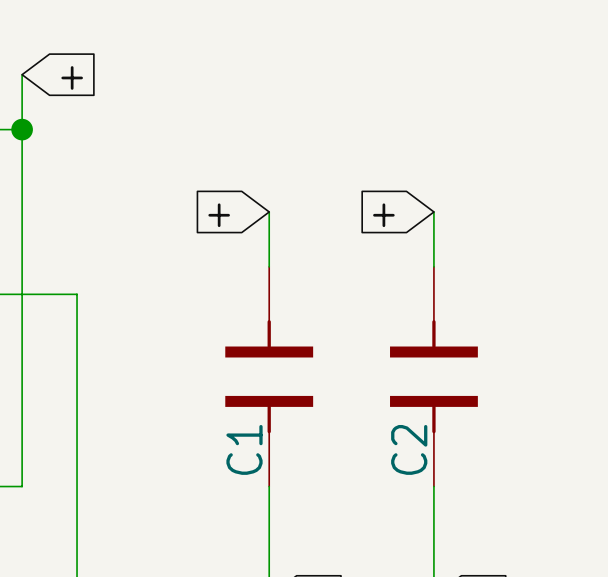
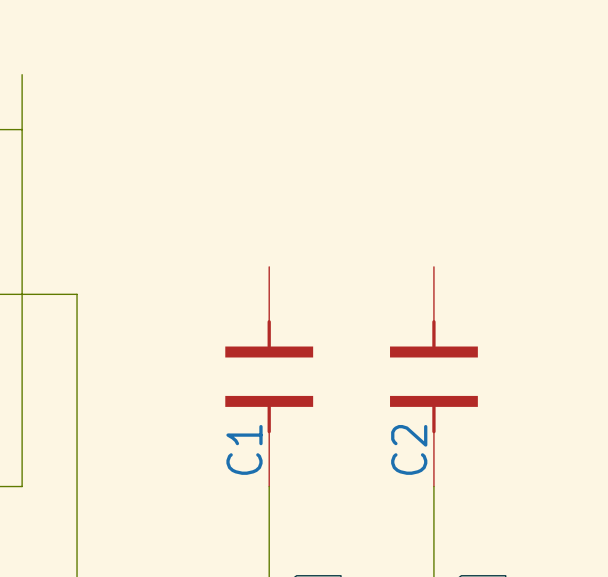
global label: + (72, 77) -> none
junction: (22, 129) -> none
wire: (269, 211) (269, 266) -> none
wire: (433, 211) (433, 266) -> none
global label: + (219, 215) -> none
global label: + (383, 215) -> none

